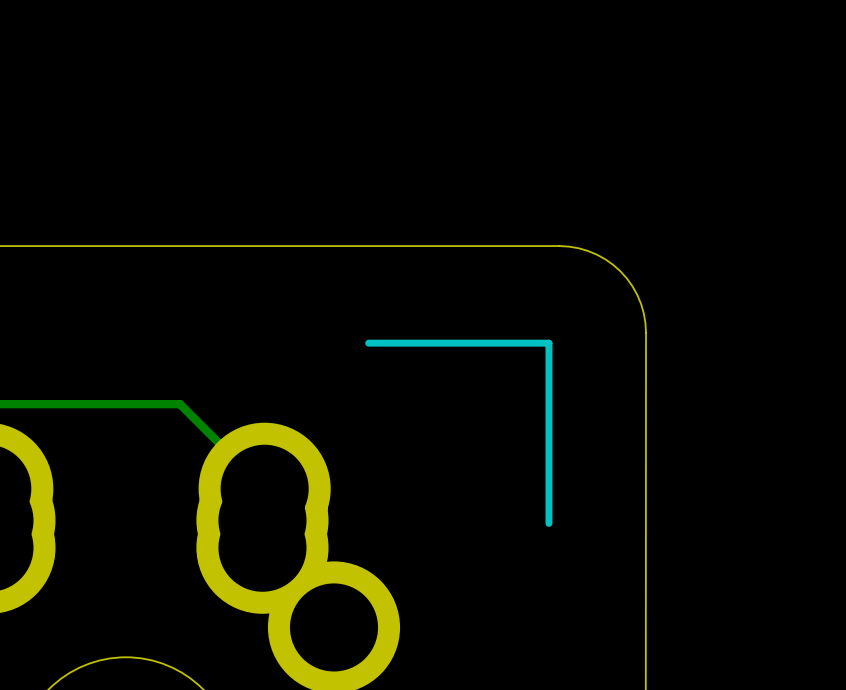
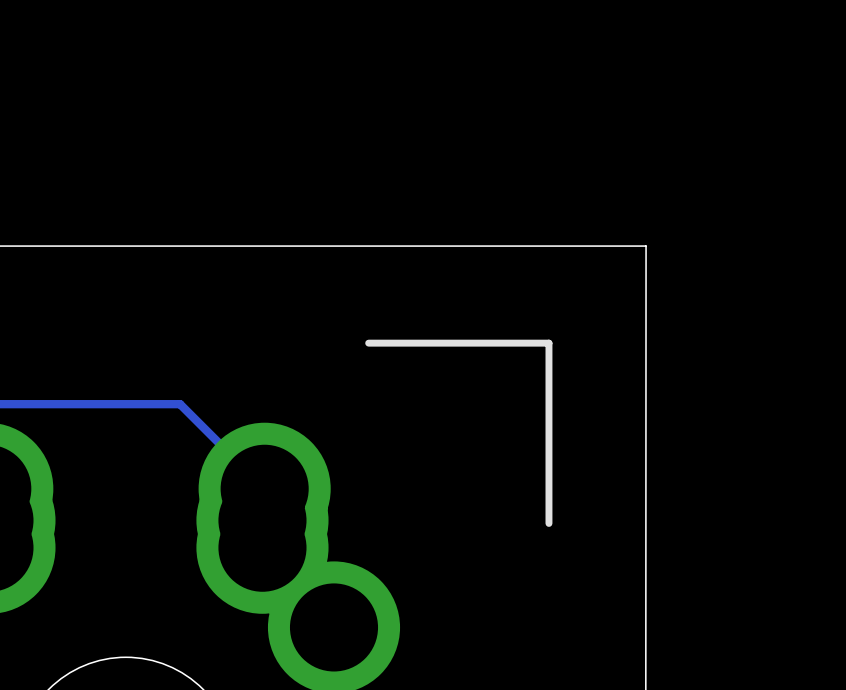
board edge: (559, 246) (578, 248) (596, 254) (620, 271) (632, 286) (641, 304) (646, 332) -> (559, 246) (646, 246) (646, 332)

